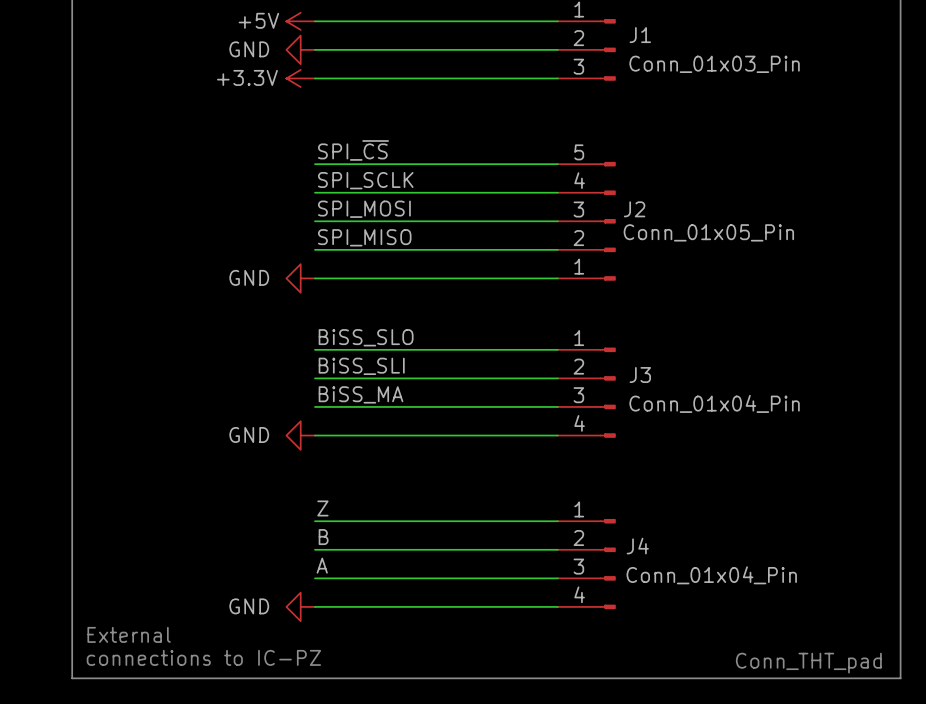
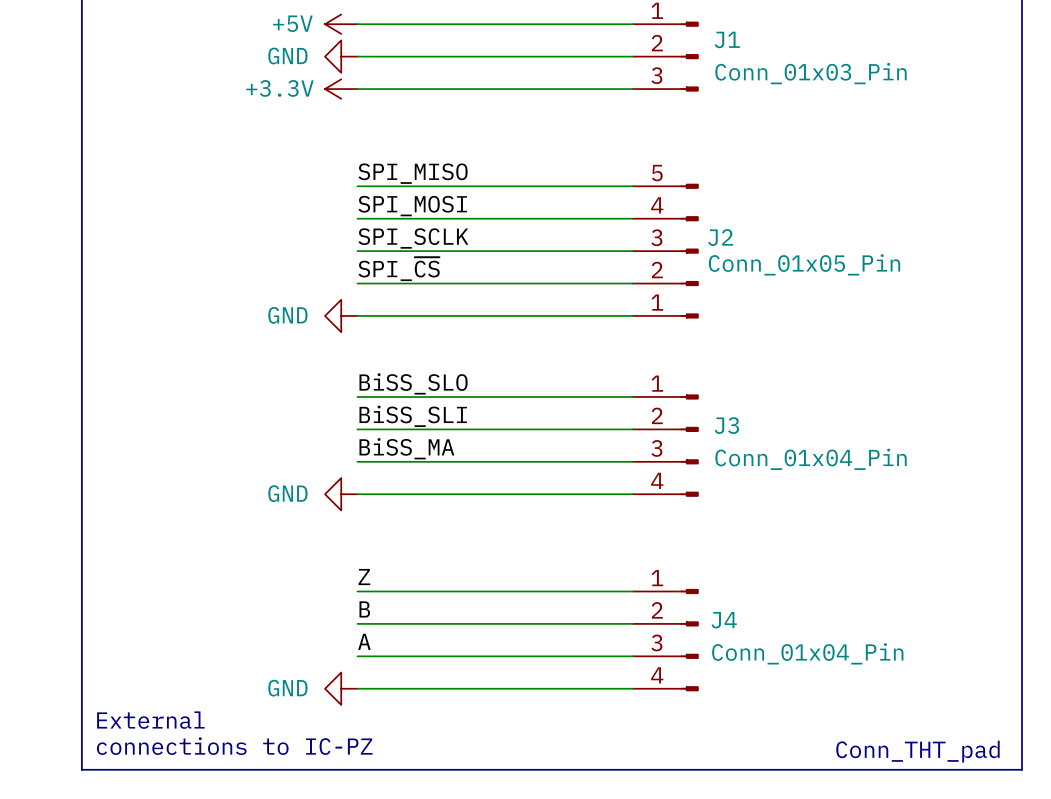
label: SPI_~{CS} (353, 150) -> SPI_MISO (413, 173)
label: SPI_SCLK (365, 180) -> SPI_MOSI (412, 206)
label: SPI_MOSI (364, 209) -> SPI_SCLK (413, 238)
label: SPI_MISO (364, 237) -> SPI_~{CS} (399, 269)

